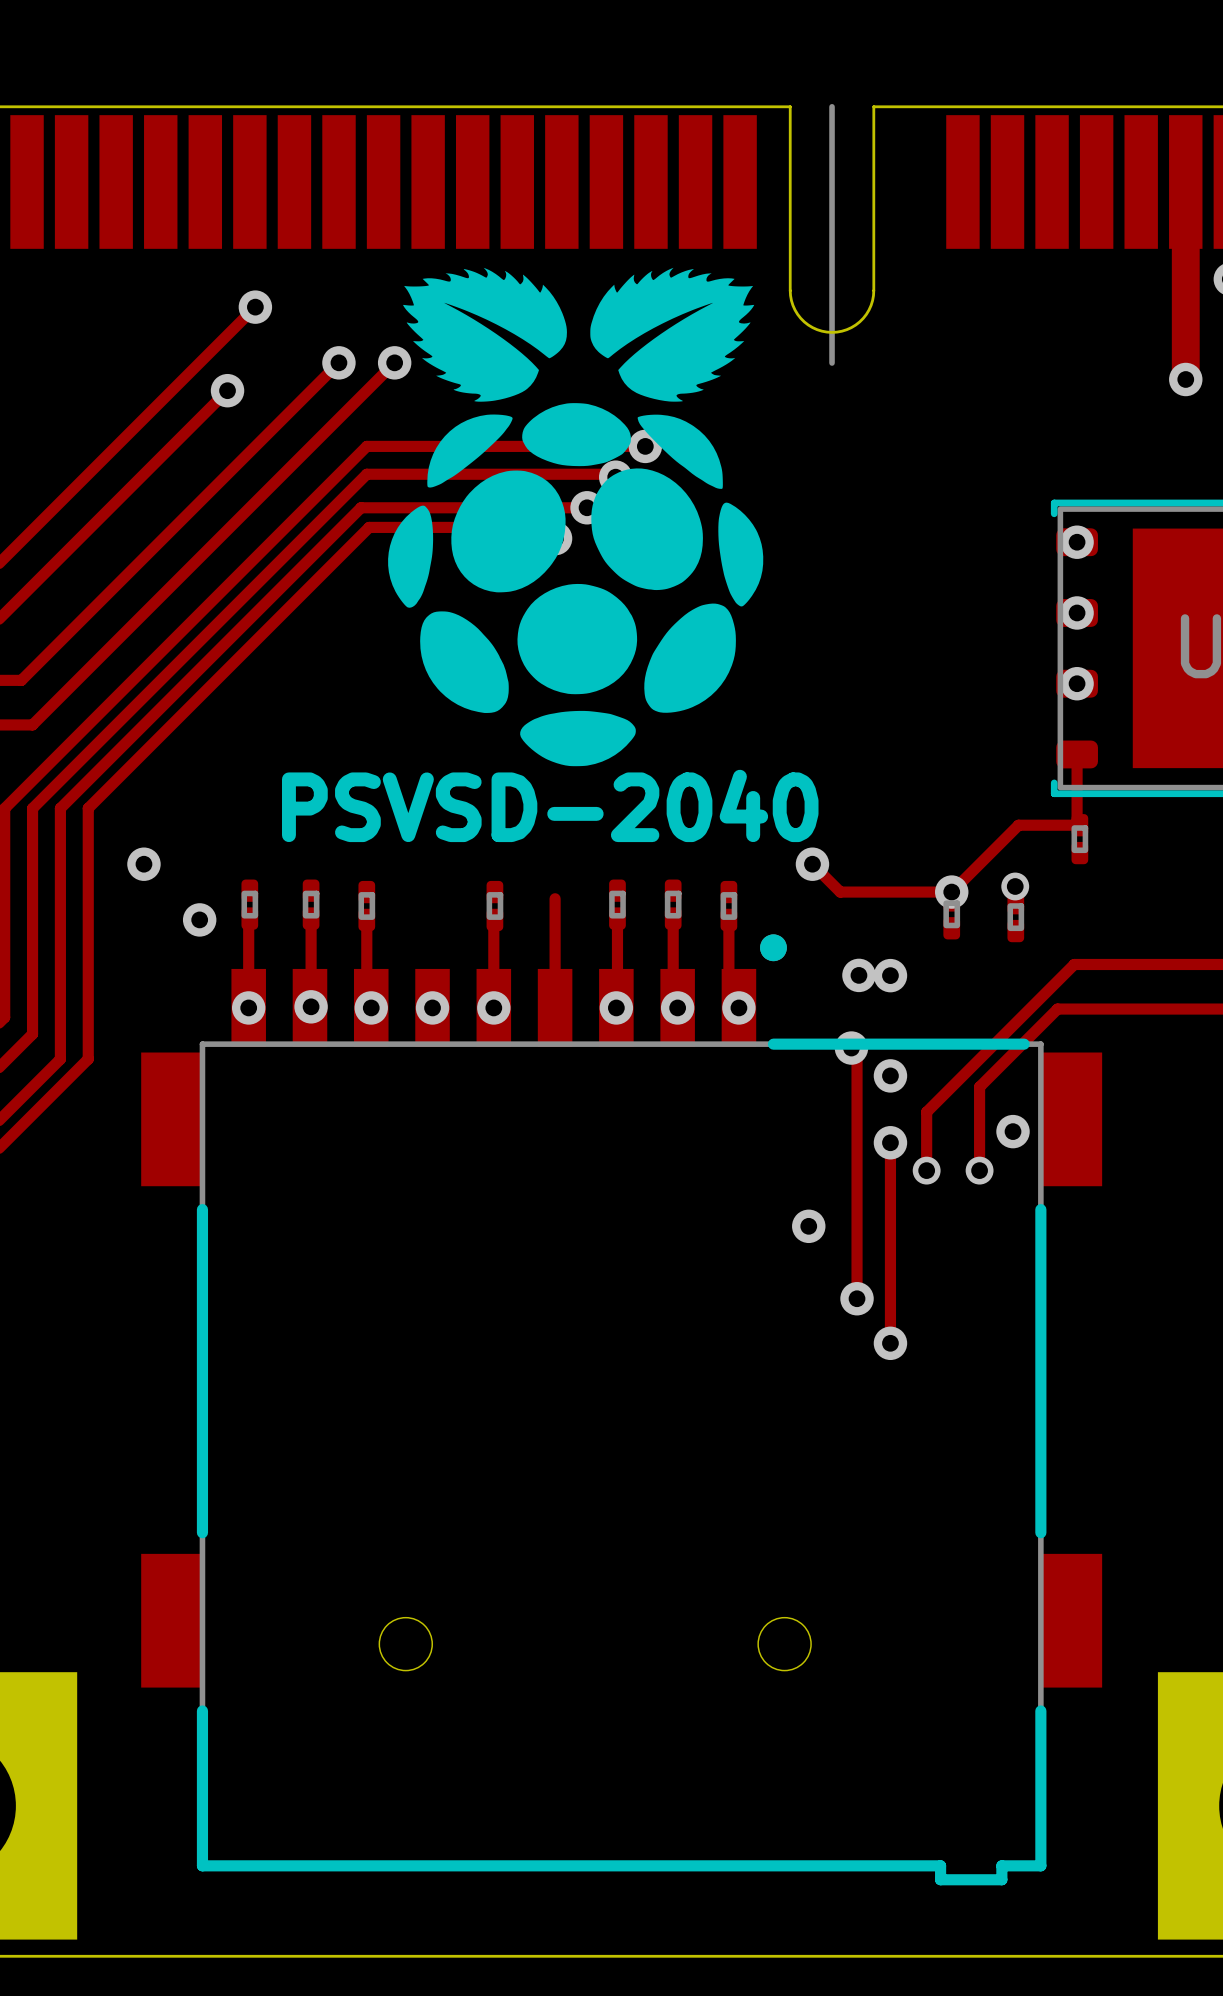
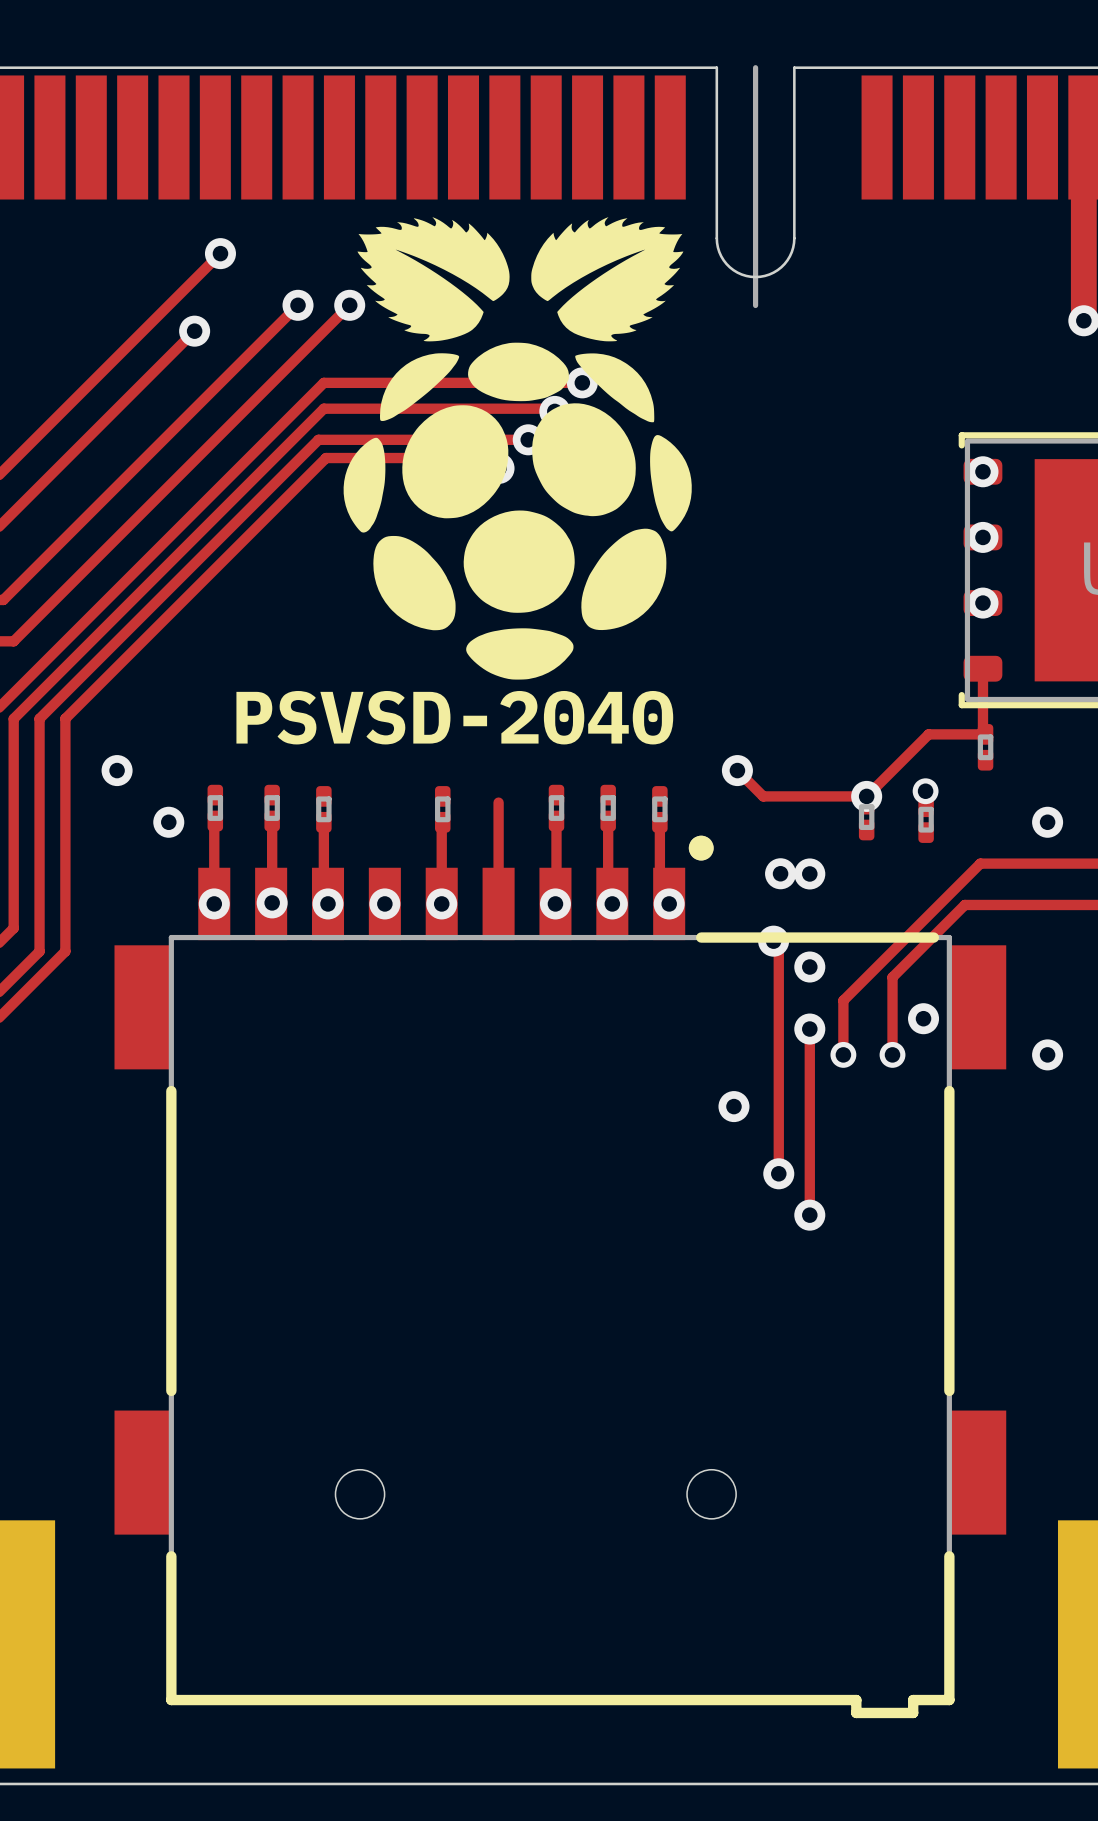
via: none -> (1047, 822)
via: none -> (1047, 1054)

